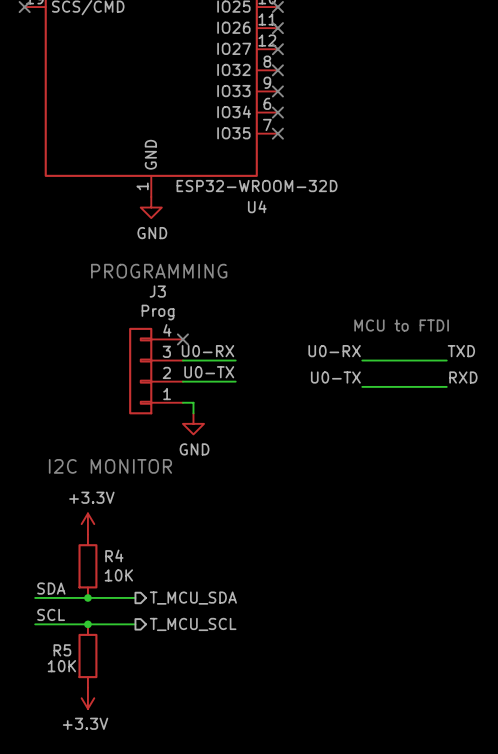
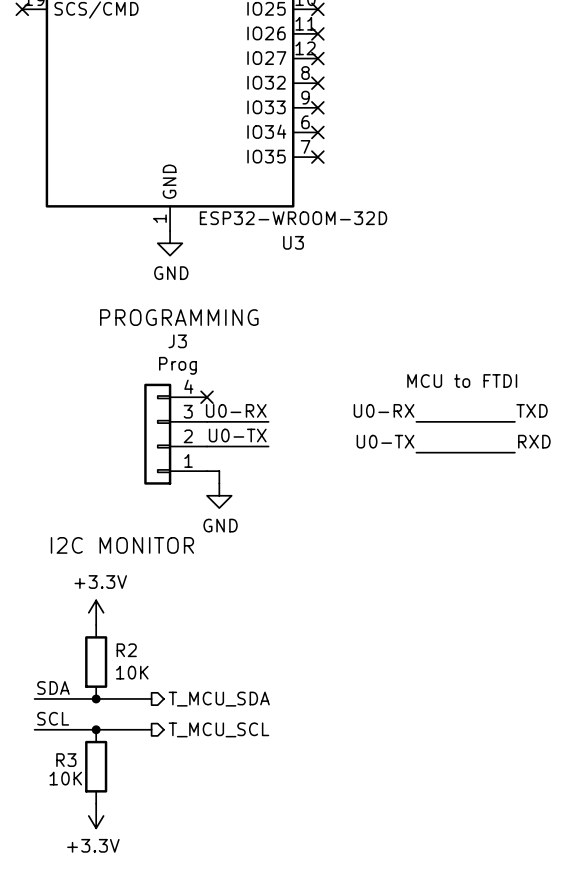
U4 name: U4 (257, 206) -> U3 (293, 242)
R4 name: R4 (114, 555) -> R2 (126, 650)
R5 name: R5 (62, 650) -> R3 (66, 760)

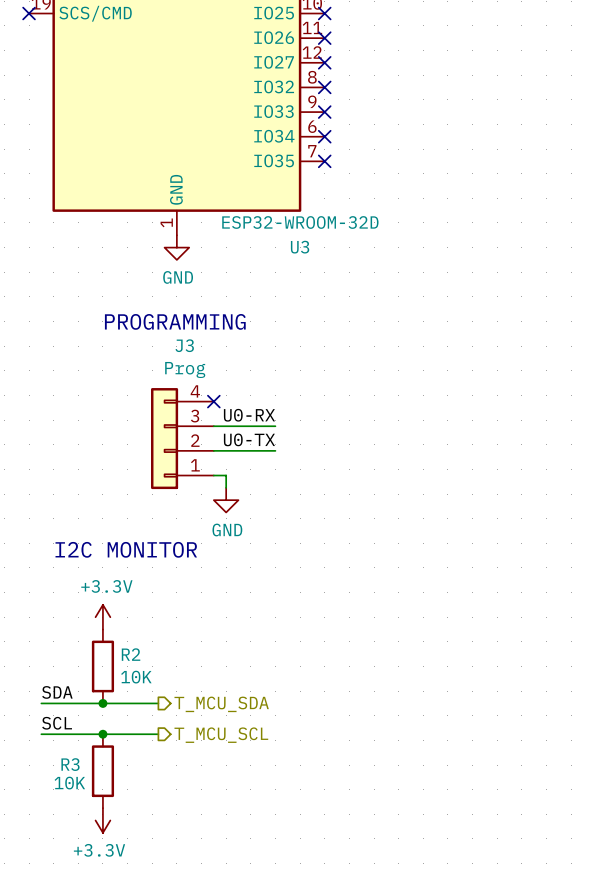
text: MCU to FTDI (462, 381) -> none
label: U0-RX (384, 410) -> none
label: TXD (532, 410) -> none
wire: (416, 421) (514, 421) -> none
label: U0-TX (385, 441) -> none
label: RXD (534, 441) -> none
wire: (416, 452) (514, 452) -> none

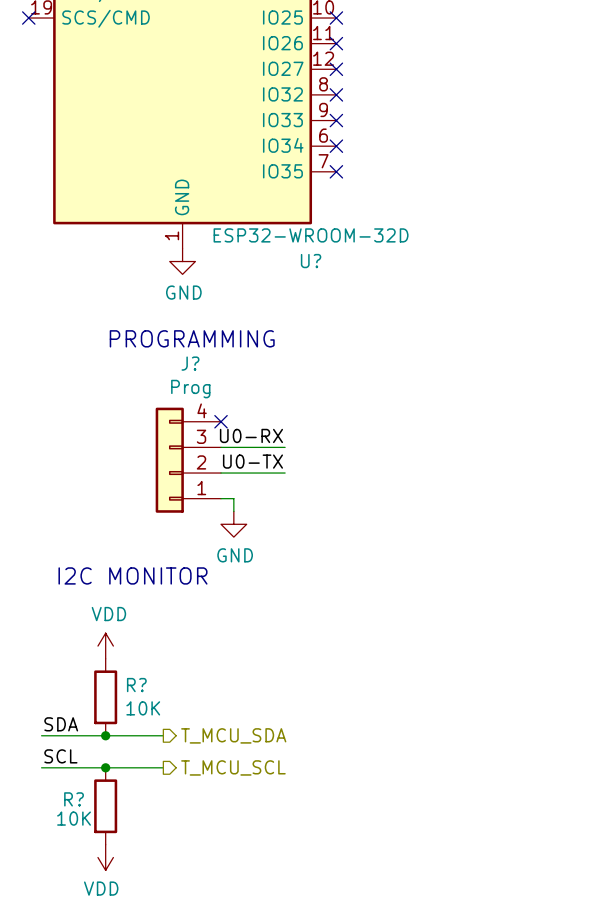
U3 name: U3 (300, 247) -> U? (311, 261)
J3 name: J3 (184, 345) -> J? (190, 363)
power symbol: +3.3V (102, 617) -> VDD (105, 646)
R2 name: R2 (131, 654) -> R? (136, 685)
R3 name: R3 (70, 764) -> R? (74, 799)
power symbol: +3.3V (102, 820) -> VDD (105, 857)

